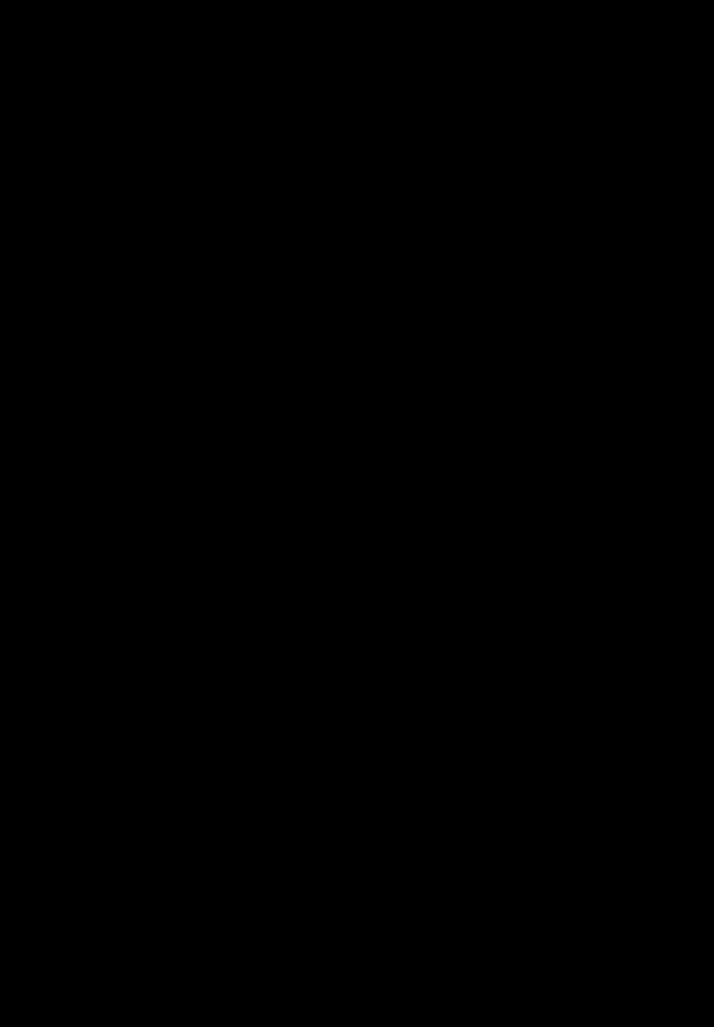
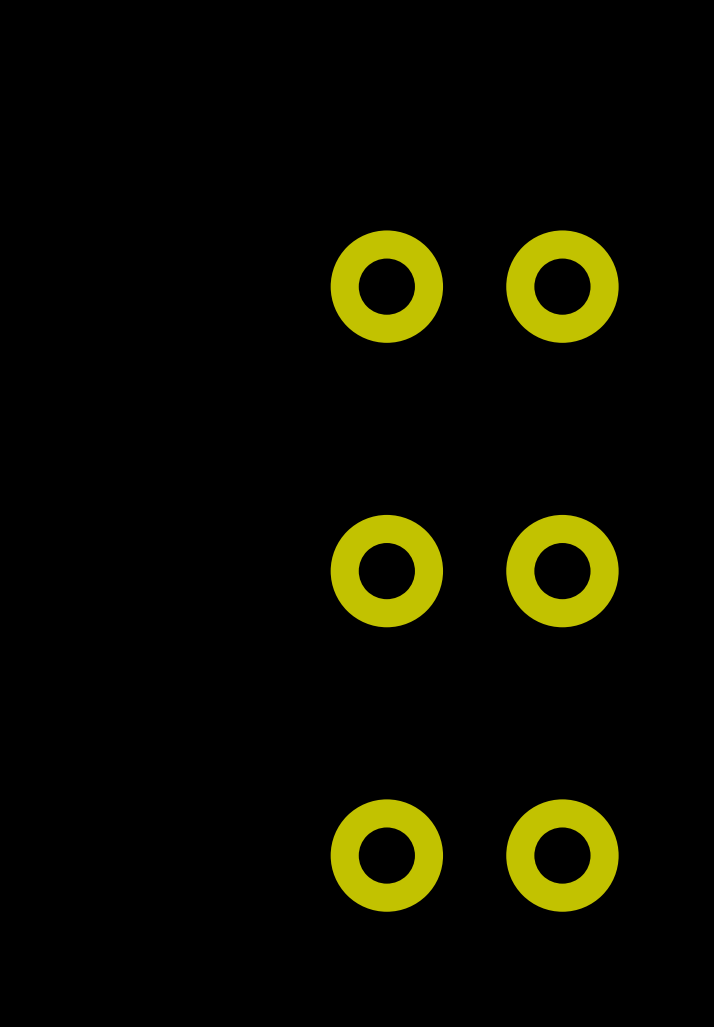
part: none -> (474, 286)
part: none -> (474, 571)
part: none -> (474, 855)

